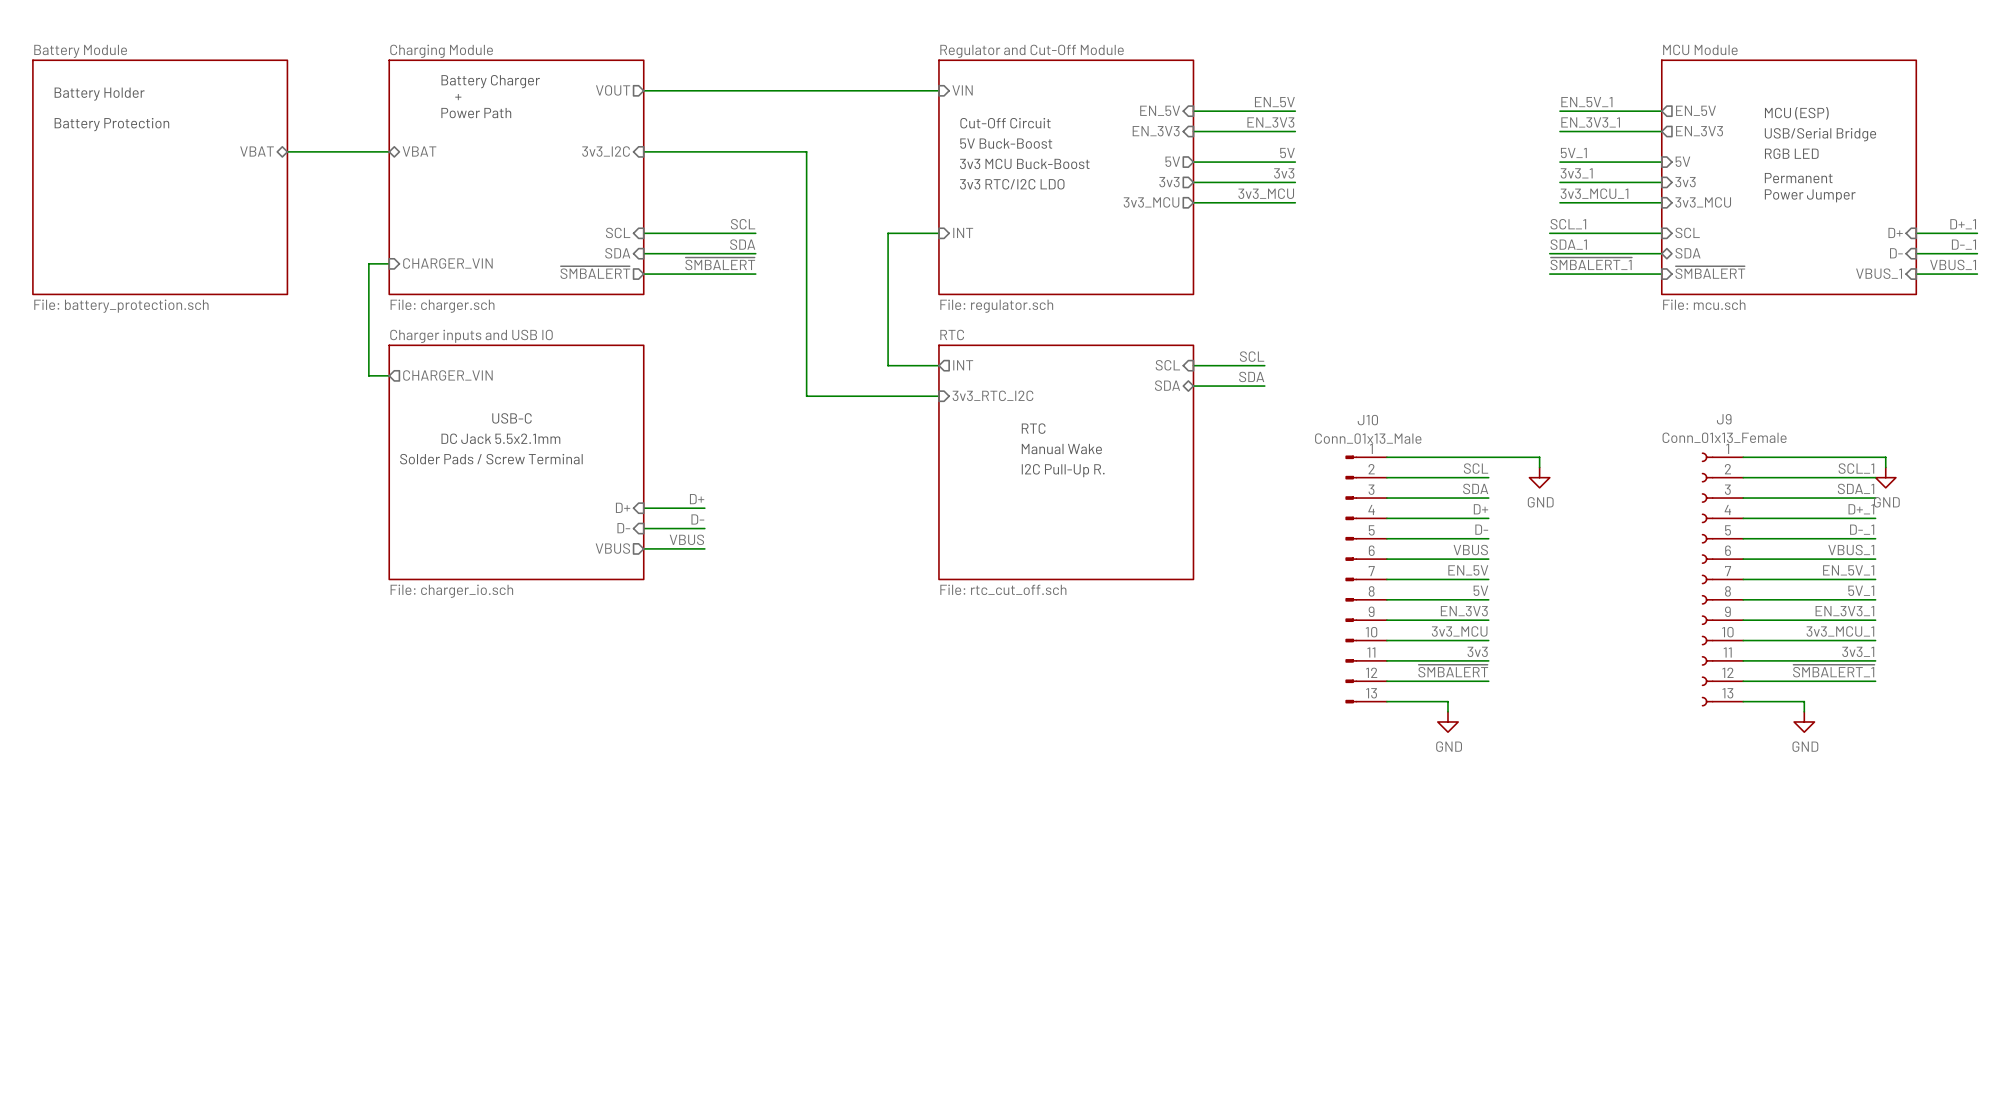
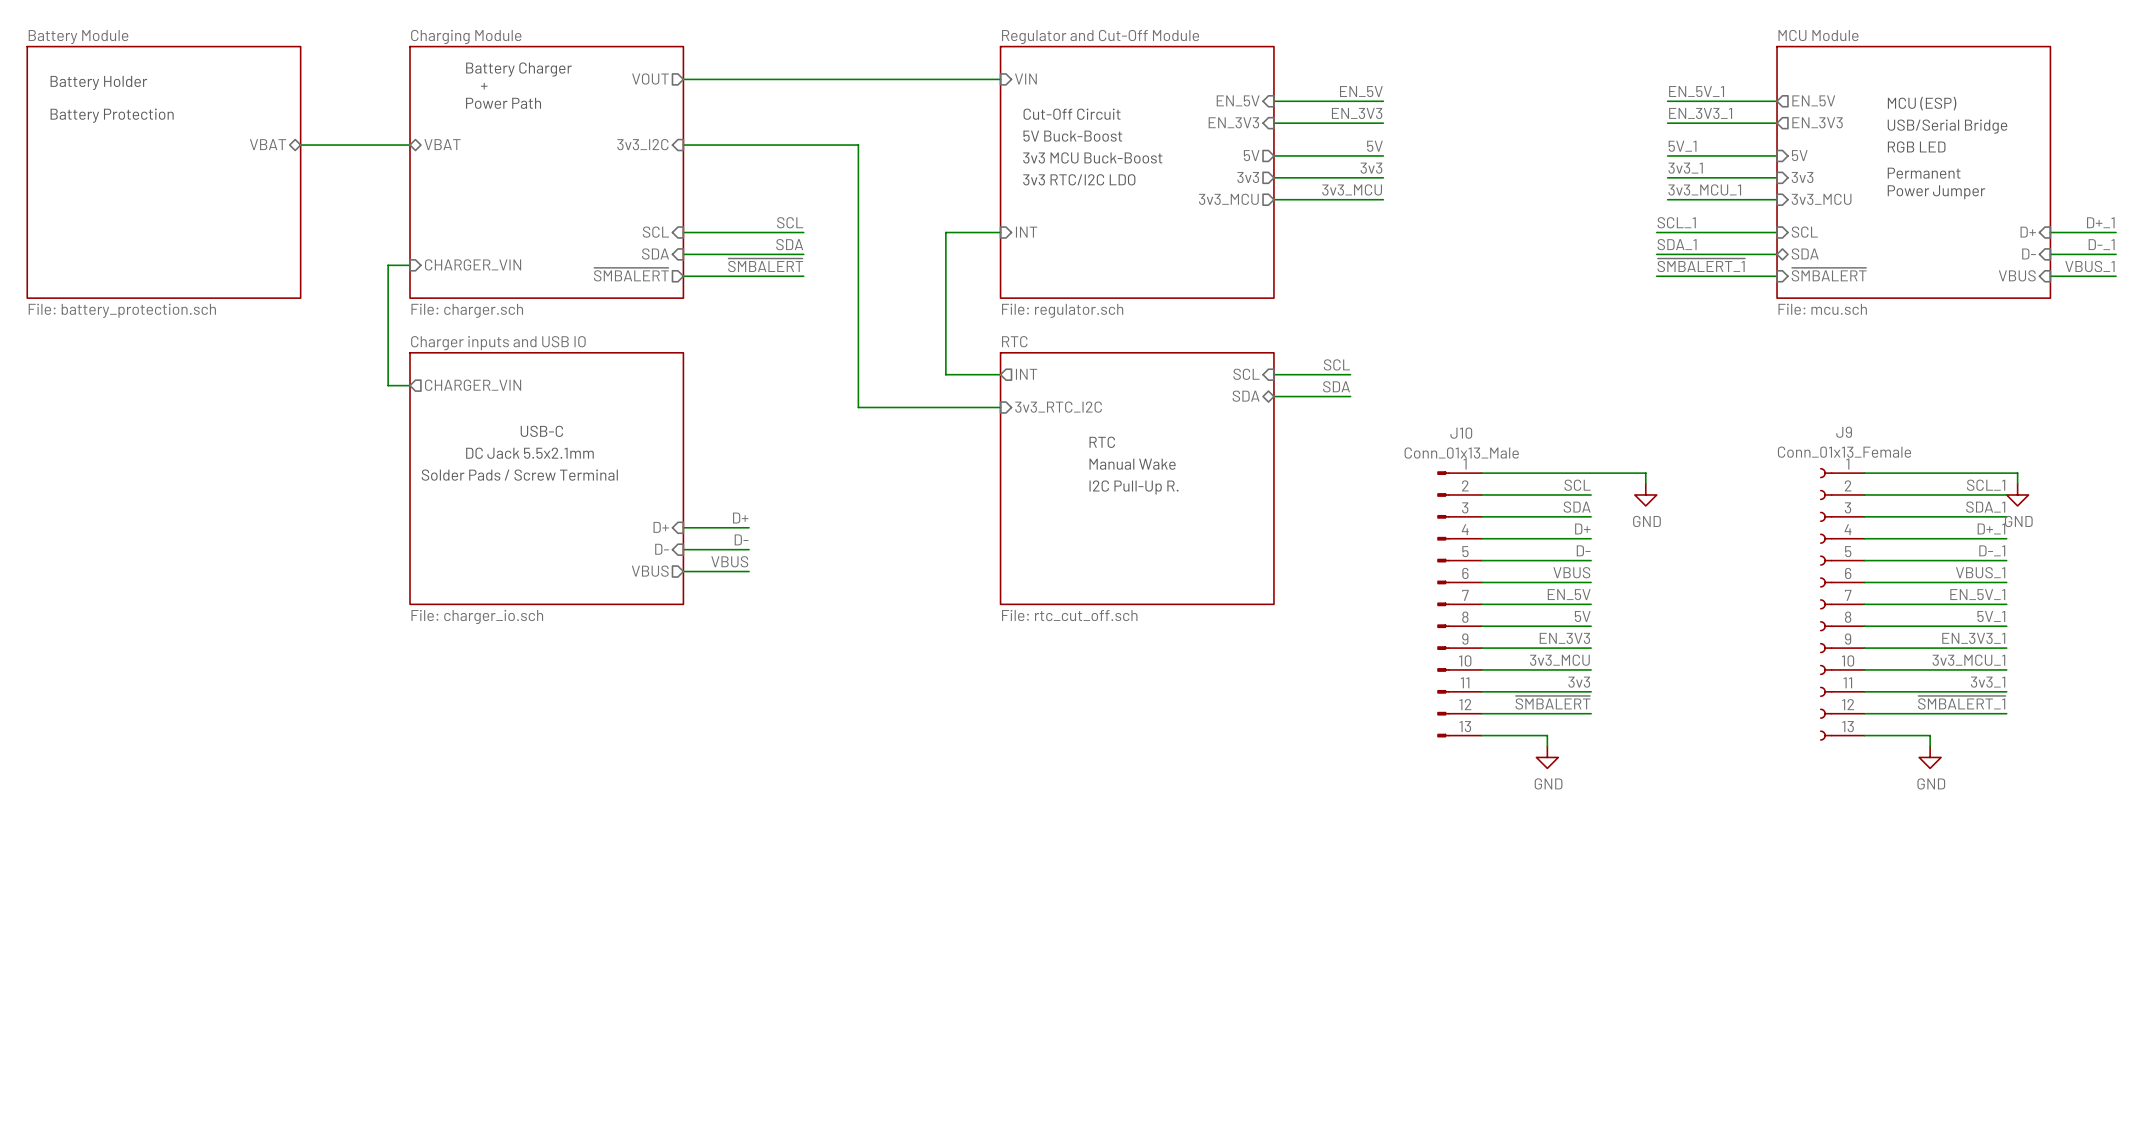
sheet pin: VBUS_1 (1879, 273) -> VBUS (2017, 275)

